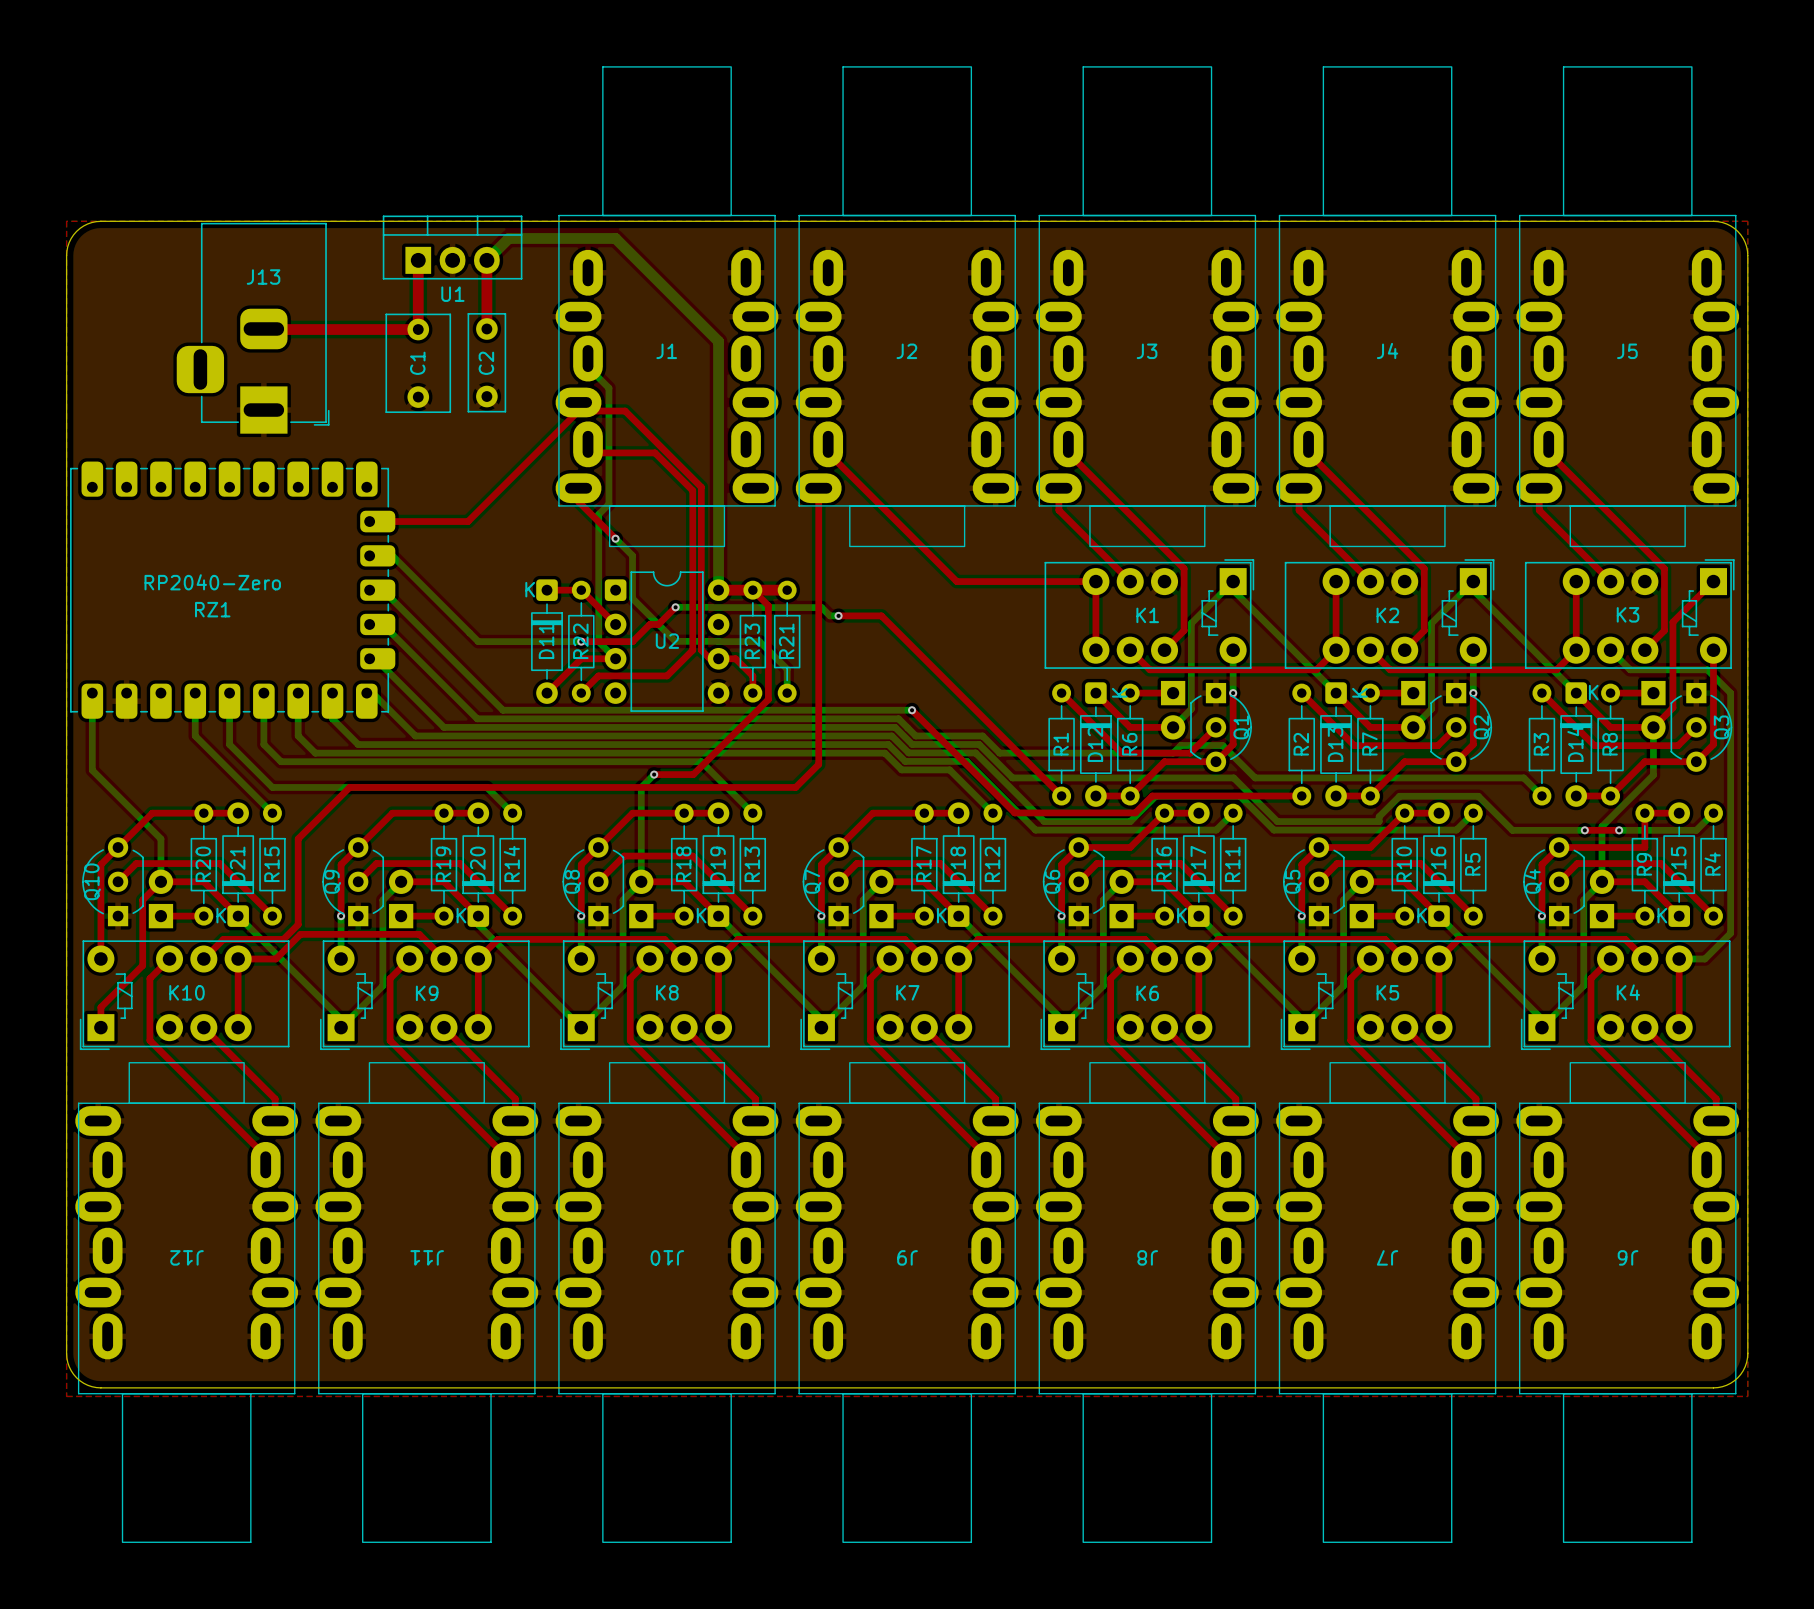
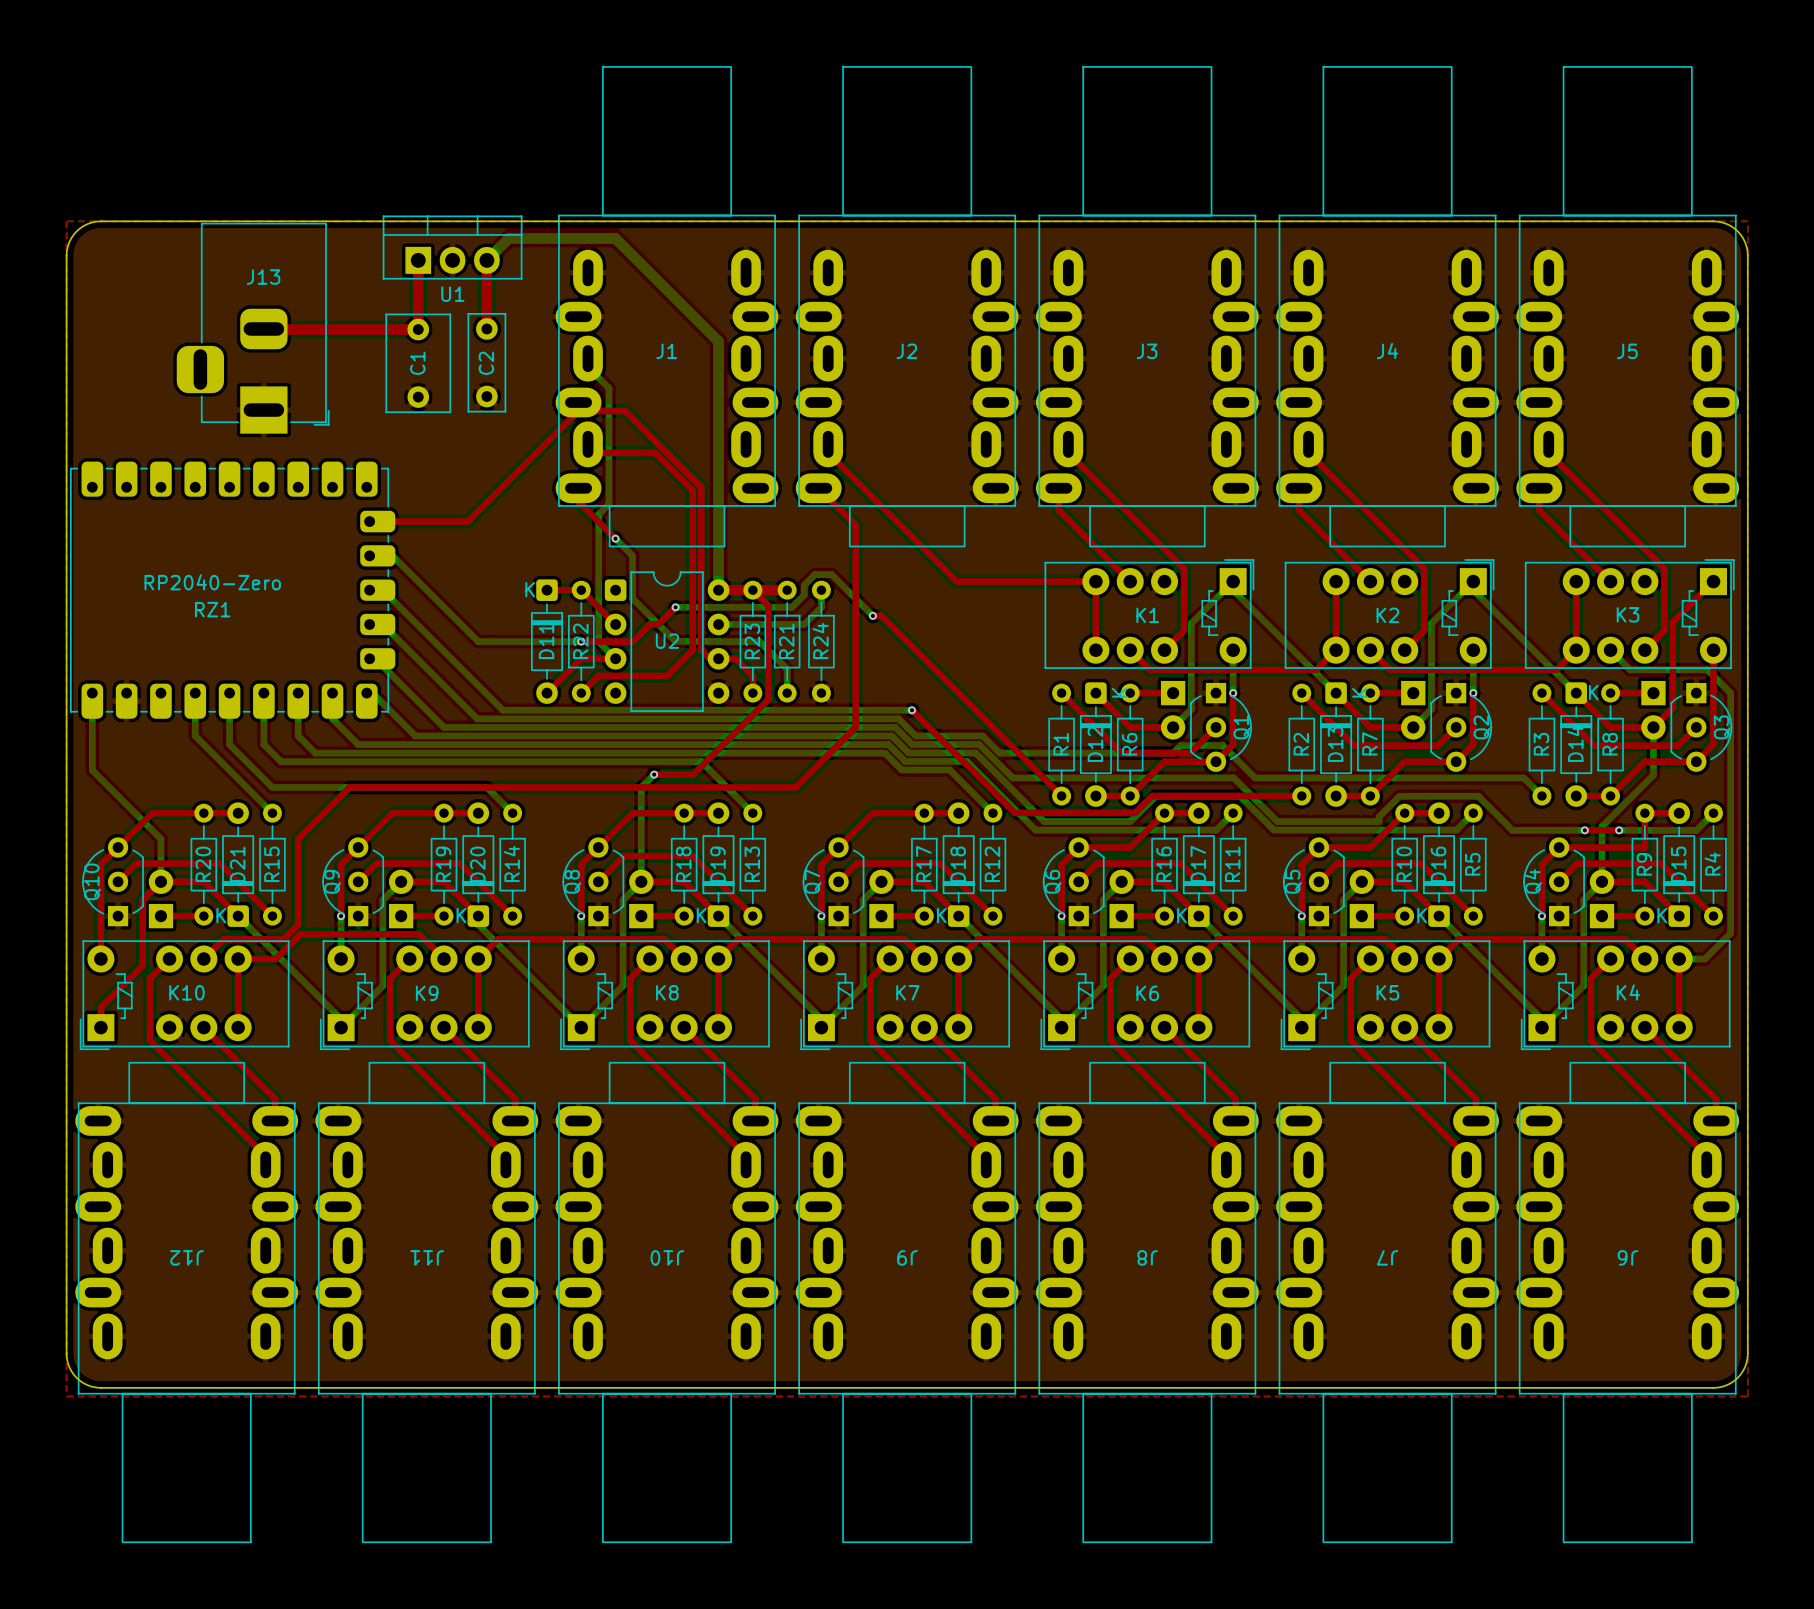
top track: (818, 488) (818, 764) -> (818, 488) (855, 525) (855, 727) (818, 764)
bottom track: none -> (821, 590) (821, 607) (804, 624) (718, 624)
bottom track: (711, 607) (821, 607) (830, 615) (838, 615) -> (711, 607) (792, 607) (804, 595) (804, 585) (814, 574) (831, 574) (872, 615)
top track: (838, 615) (872, 615) -> none
via position: (838, 615) -> (872, 615)
R24: none -> (821, 641)

